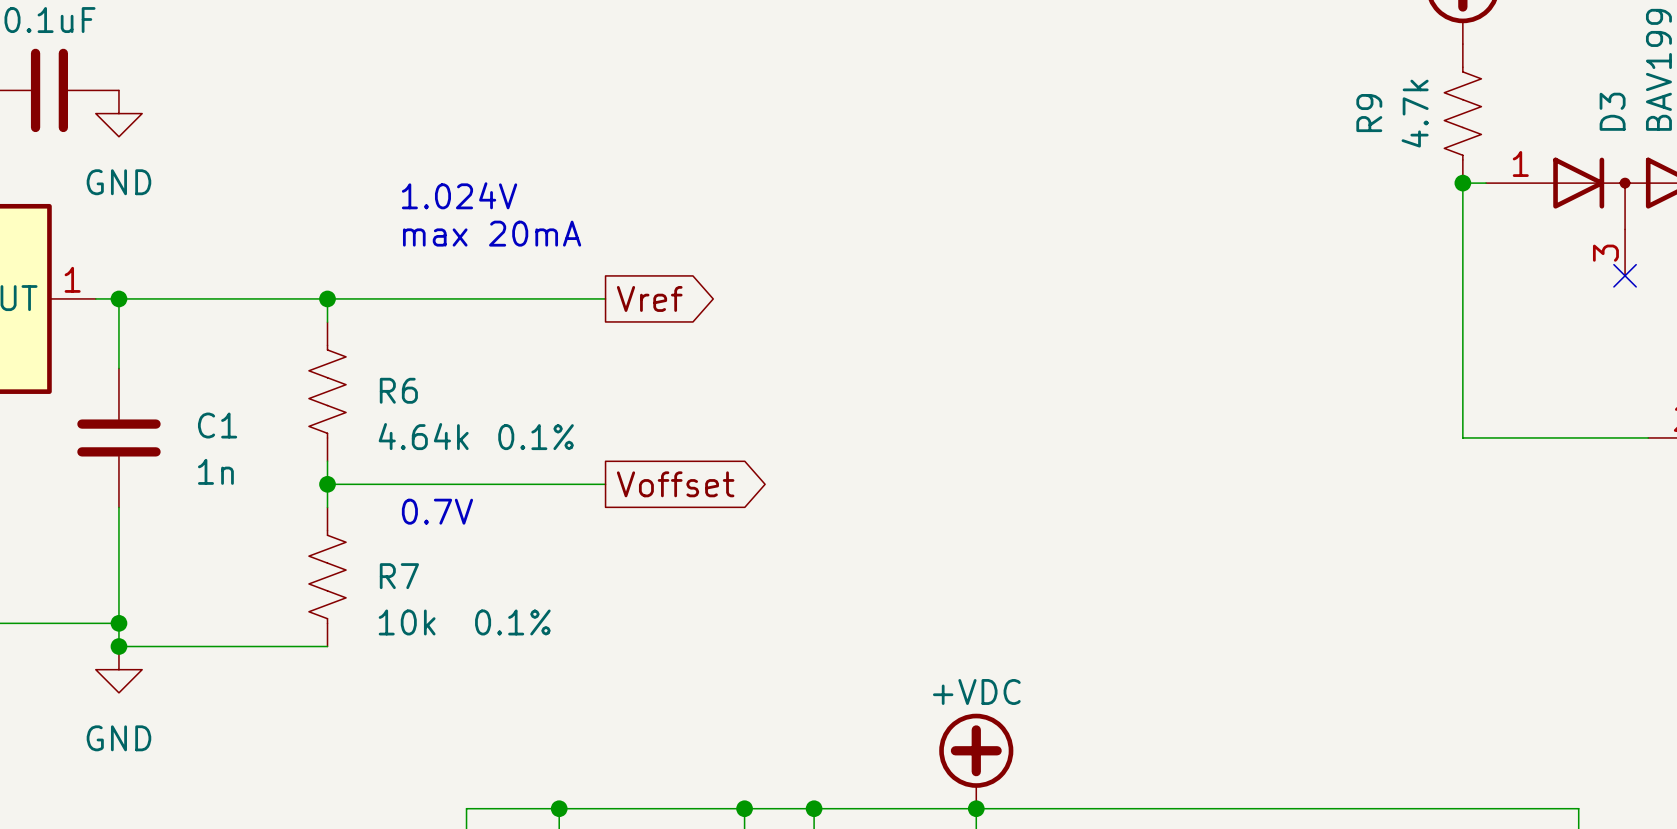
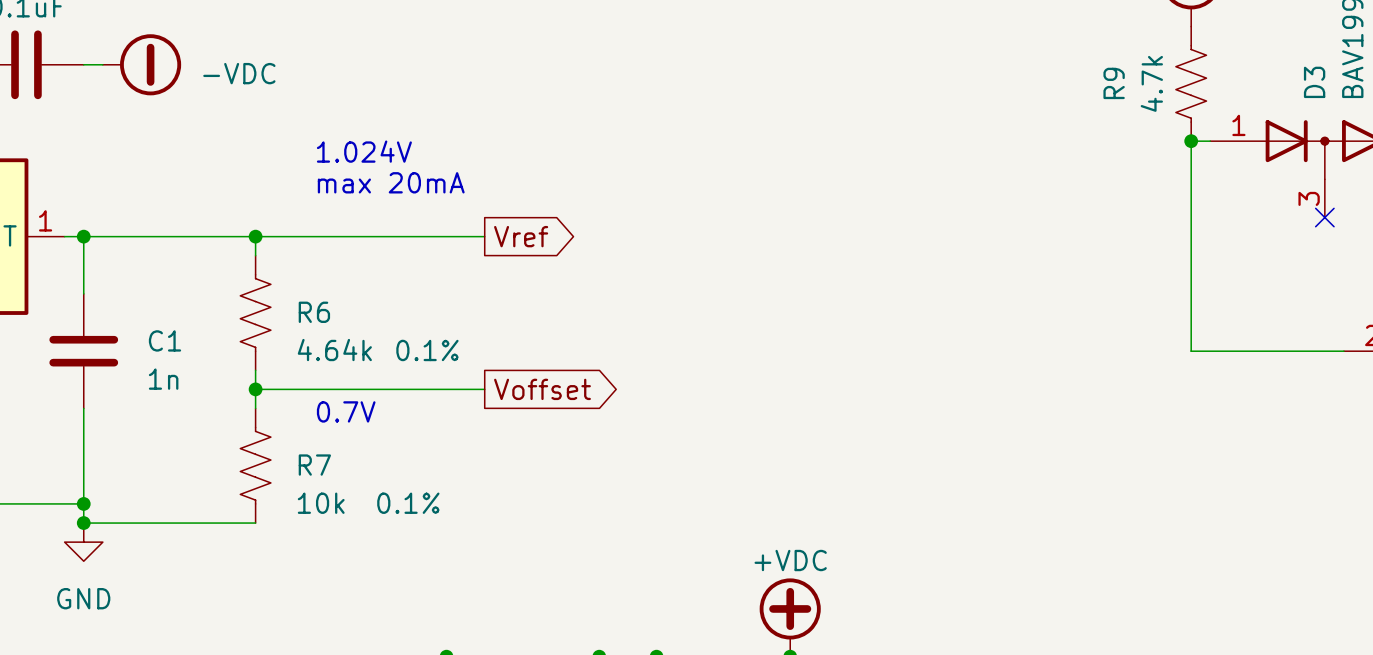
wire: none -> (83, 64) (102, 64)
power symbol: none -> -VDC (141, 64)
power symbol: GND (118, 113) -> none

